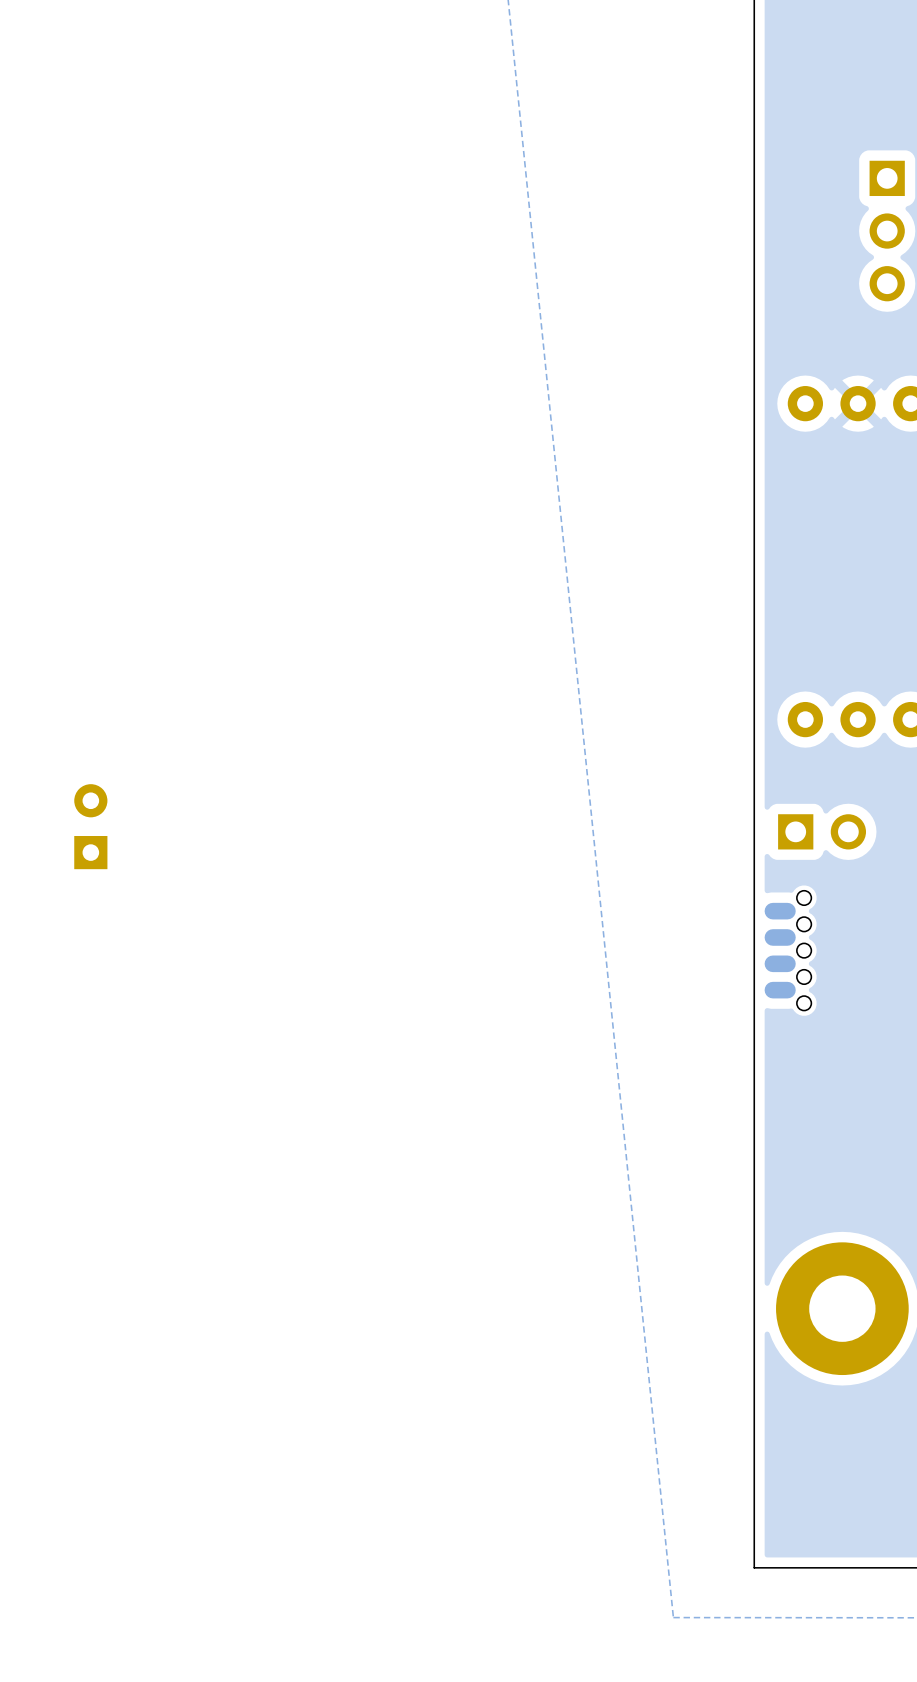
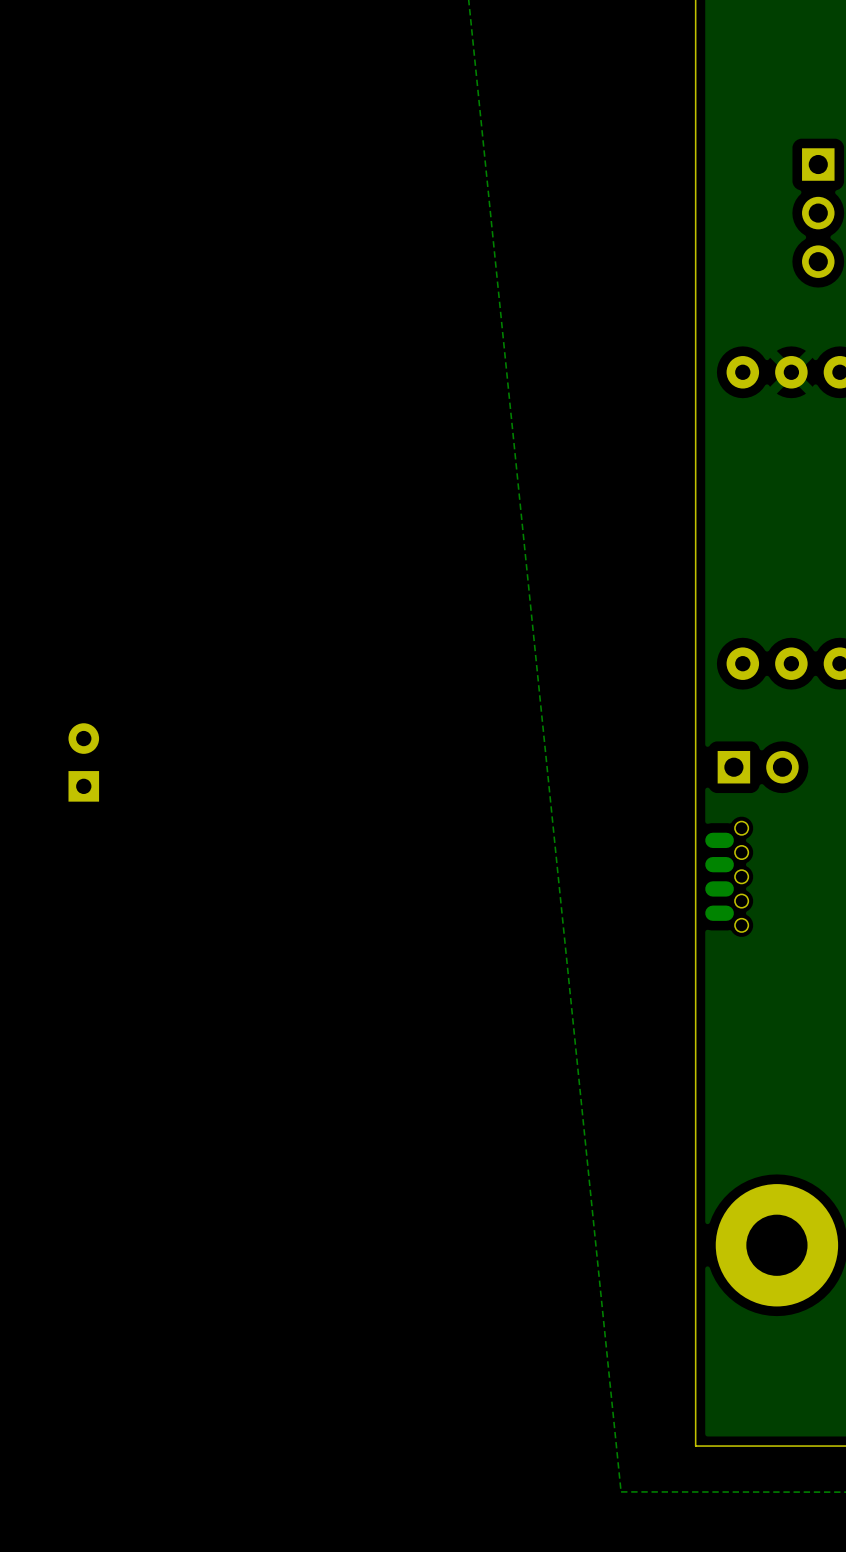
part position: (842, 1308) -> (776, 1245)

